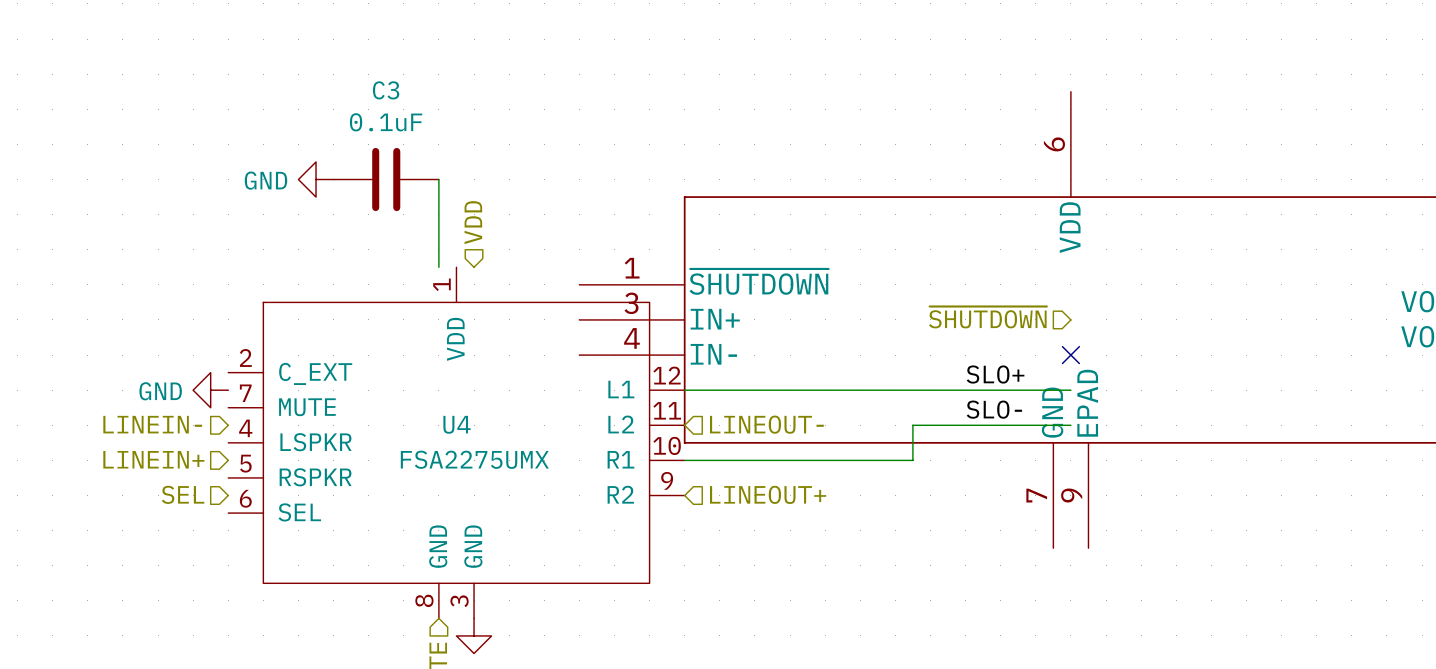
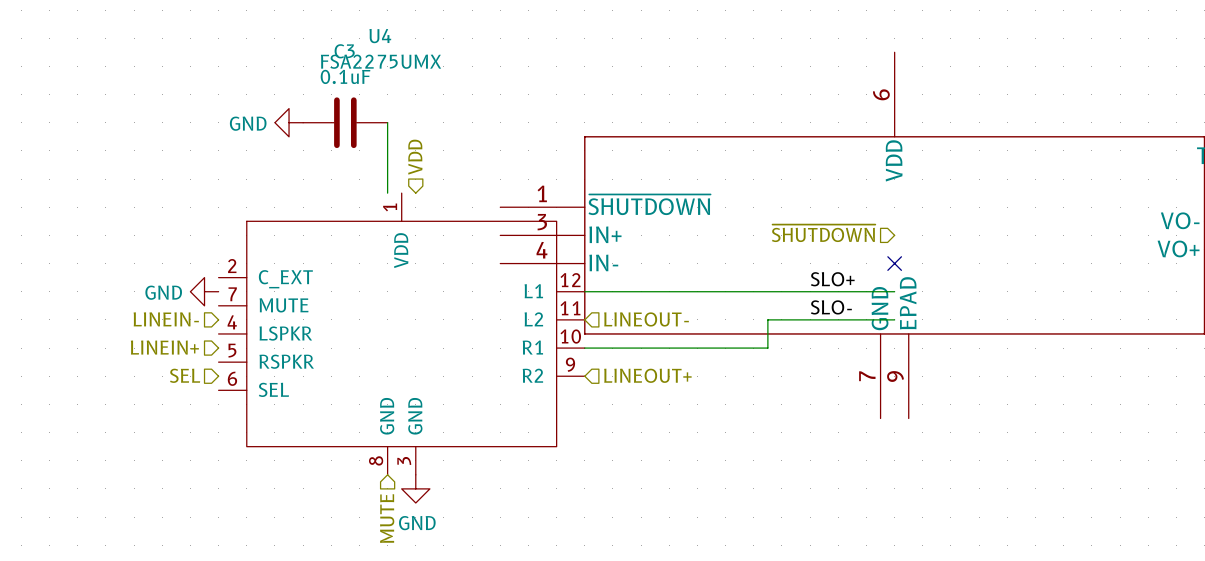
U4 name position: U4 (456, 424) -> U4 (380, 36)
U4 value position: FSA2275UMX (474, 459) -> FSA2275UMX (381, 61)

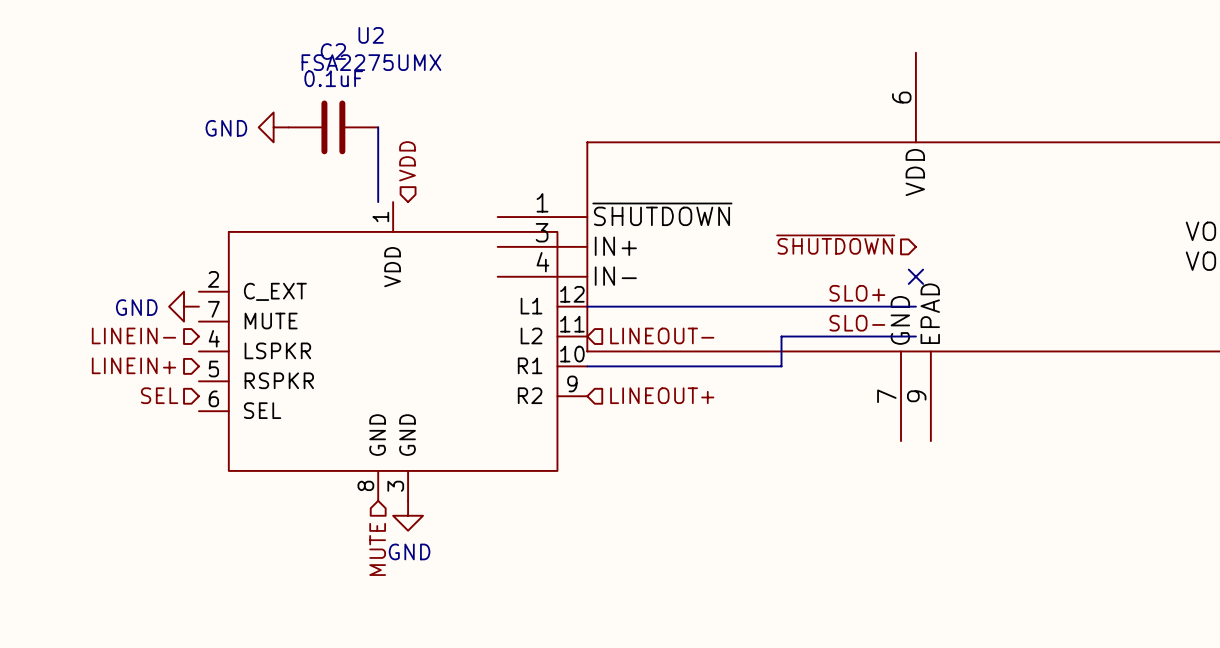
U4 name: U4 (380, 36) -> U2 (371, 35)
C3 name: C3 (344, 51) -> C2 (333, 51)

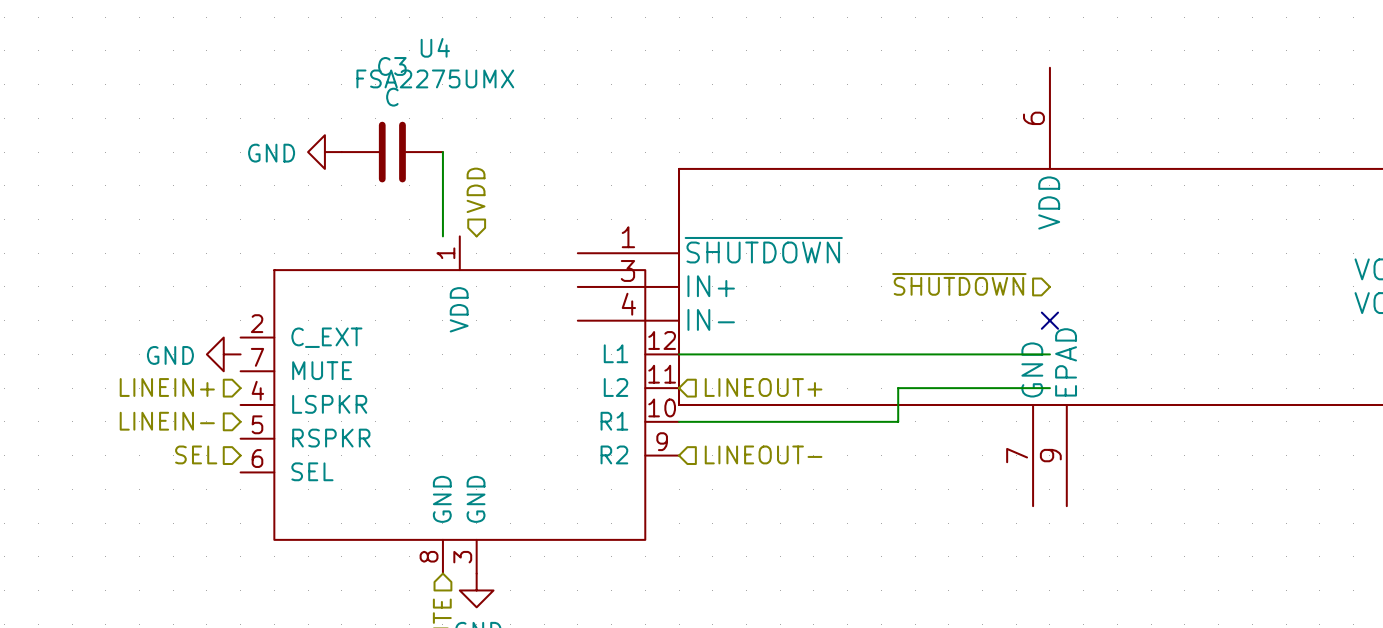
U2 name: U2 (371, 35) -> U4 (435, 47)
C2 name: C2 (333, 51) -> C3 (392, 66)
C2 value: 0.1uF (333, 78) -> C (392, 97)
label: SLO+ (857, 293) -> none
label: SLO- (857, 323) -> none
hierarchical label: LINEIN- (133, 335) -> LINEIN+ (167, 387)
hierarchical label: LINEOUT- (662, 335) -> LINEOUT+ (763, 387)
hierarchical label: LINEIN+ (133, 365) -> LINEIN- (167, 421)
hierarchical label: LINEOUT+ (662, 395) -> LINEOUT- (763, 454)

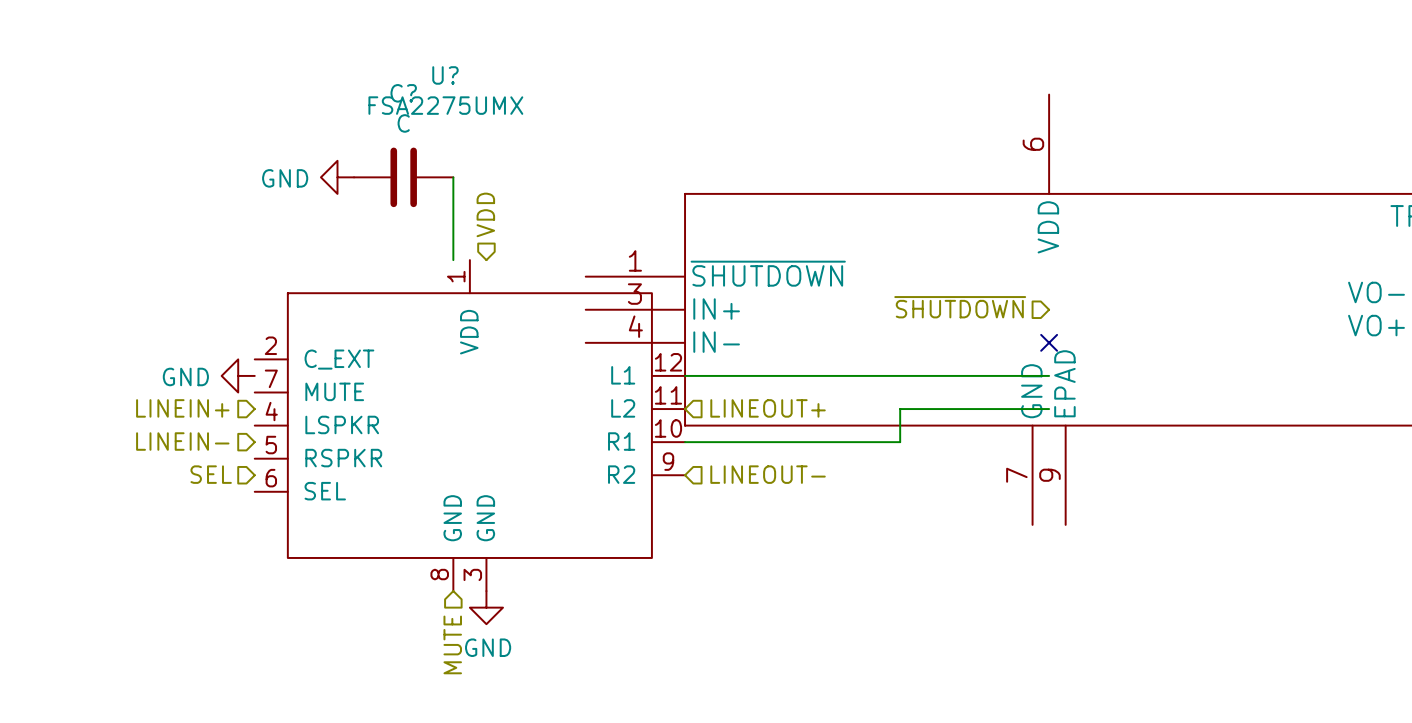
U4 name: U4 (435, 47) -> U? (445, 75)
C3 name: C3 (392, 66) -> C? (403, 93)

